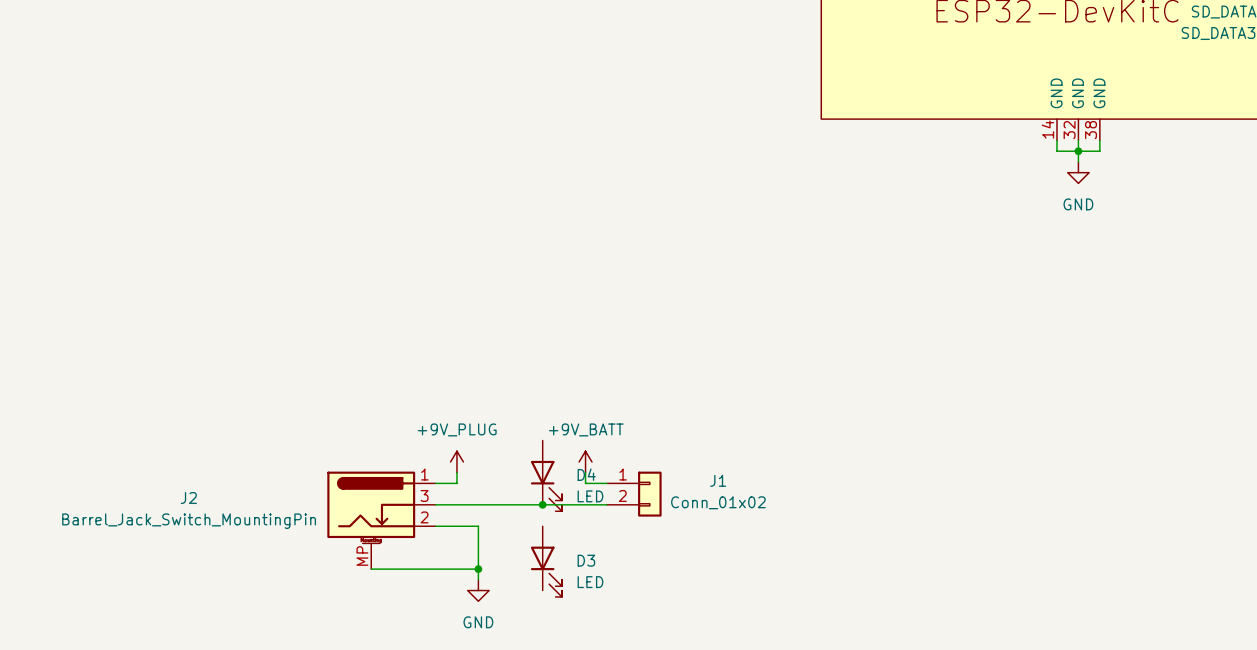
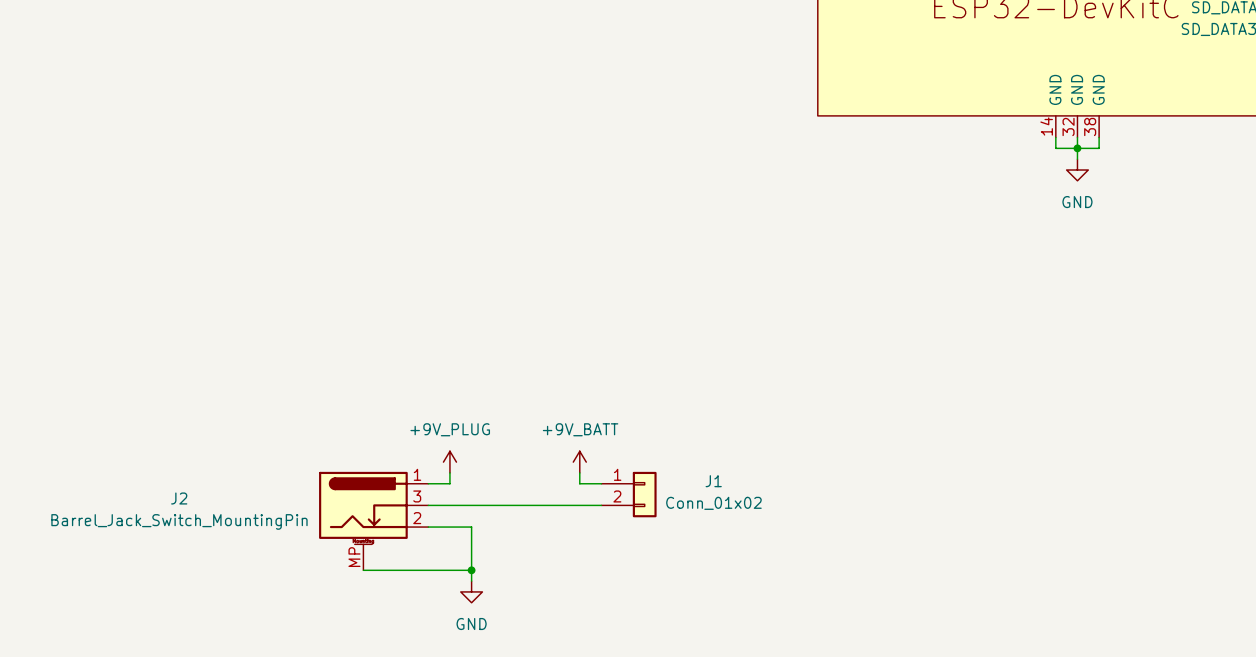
D4: LED (546, 475) -> none
junction: (542, 504) -> none
D3: LED (546, 561) -> none

